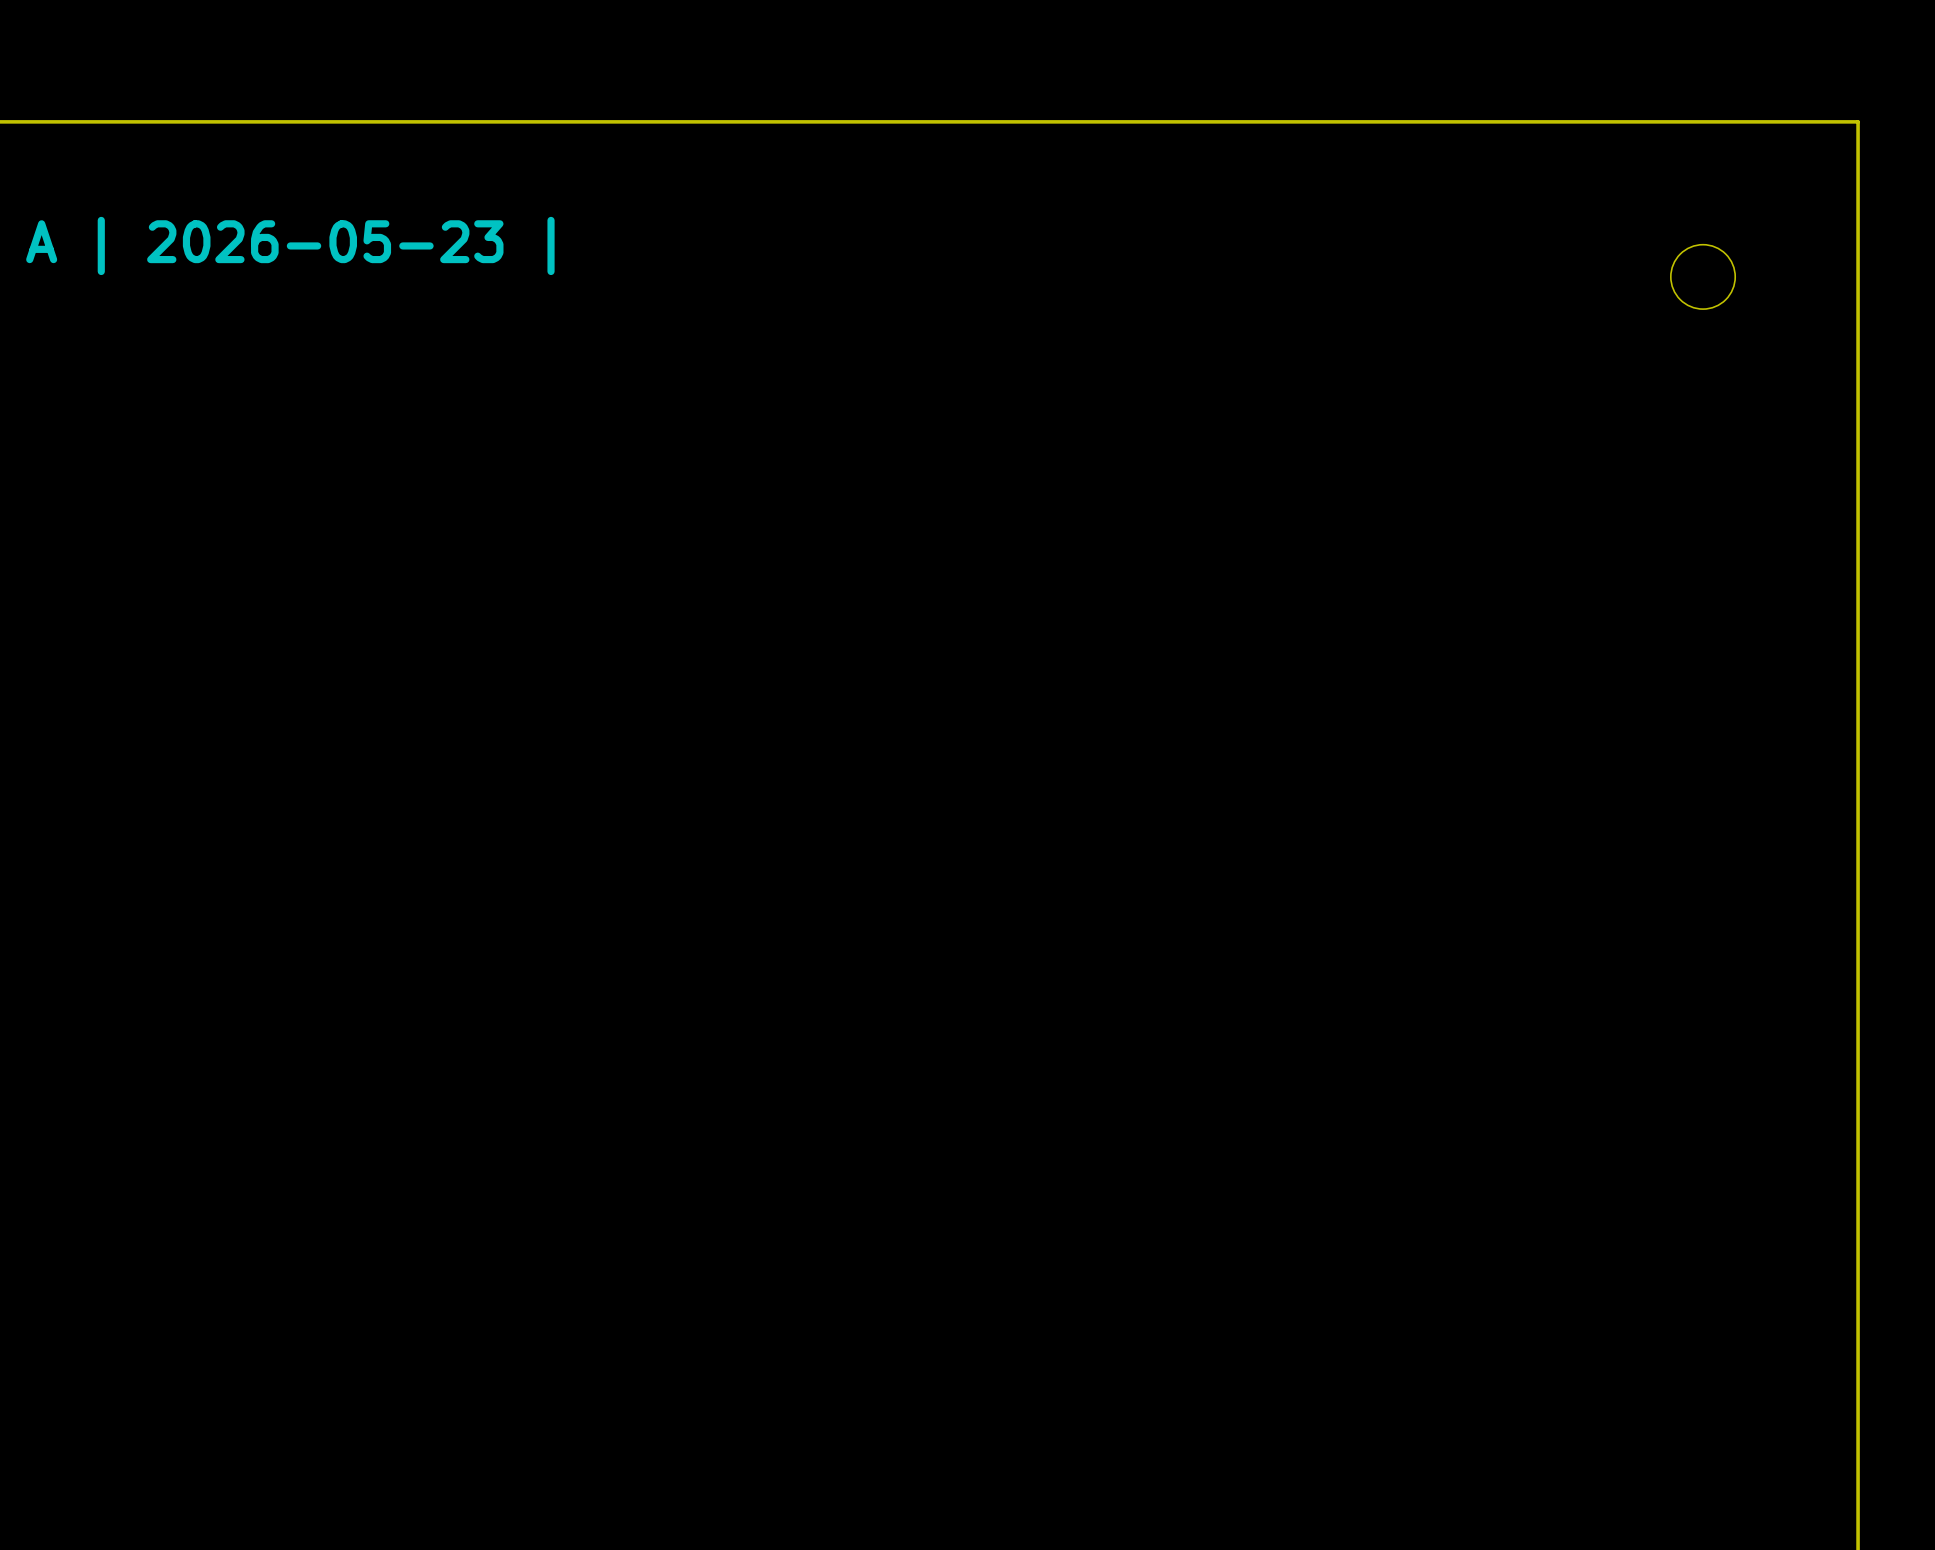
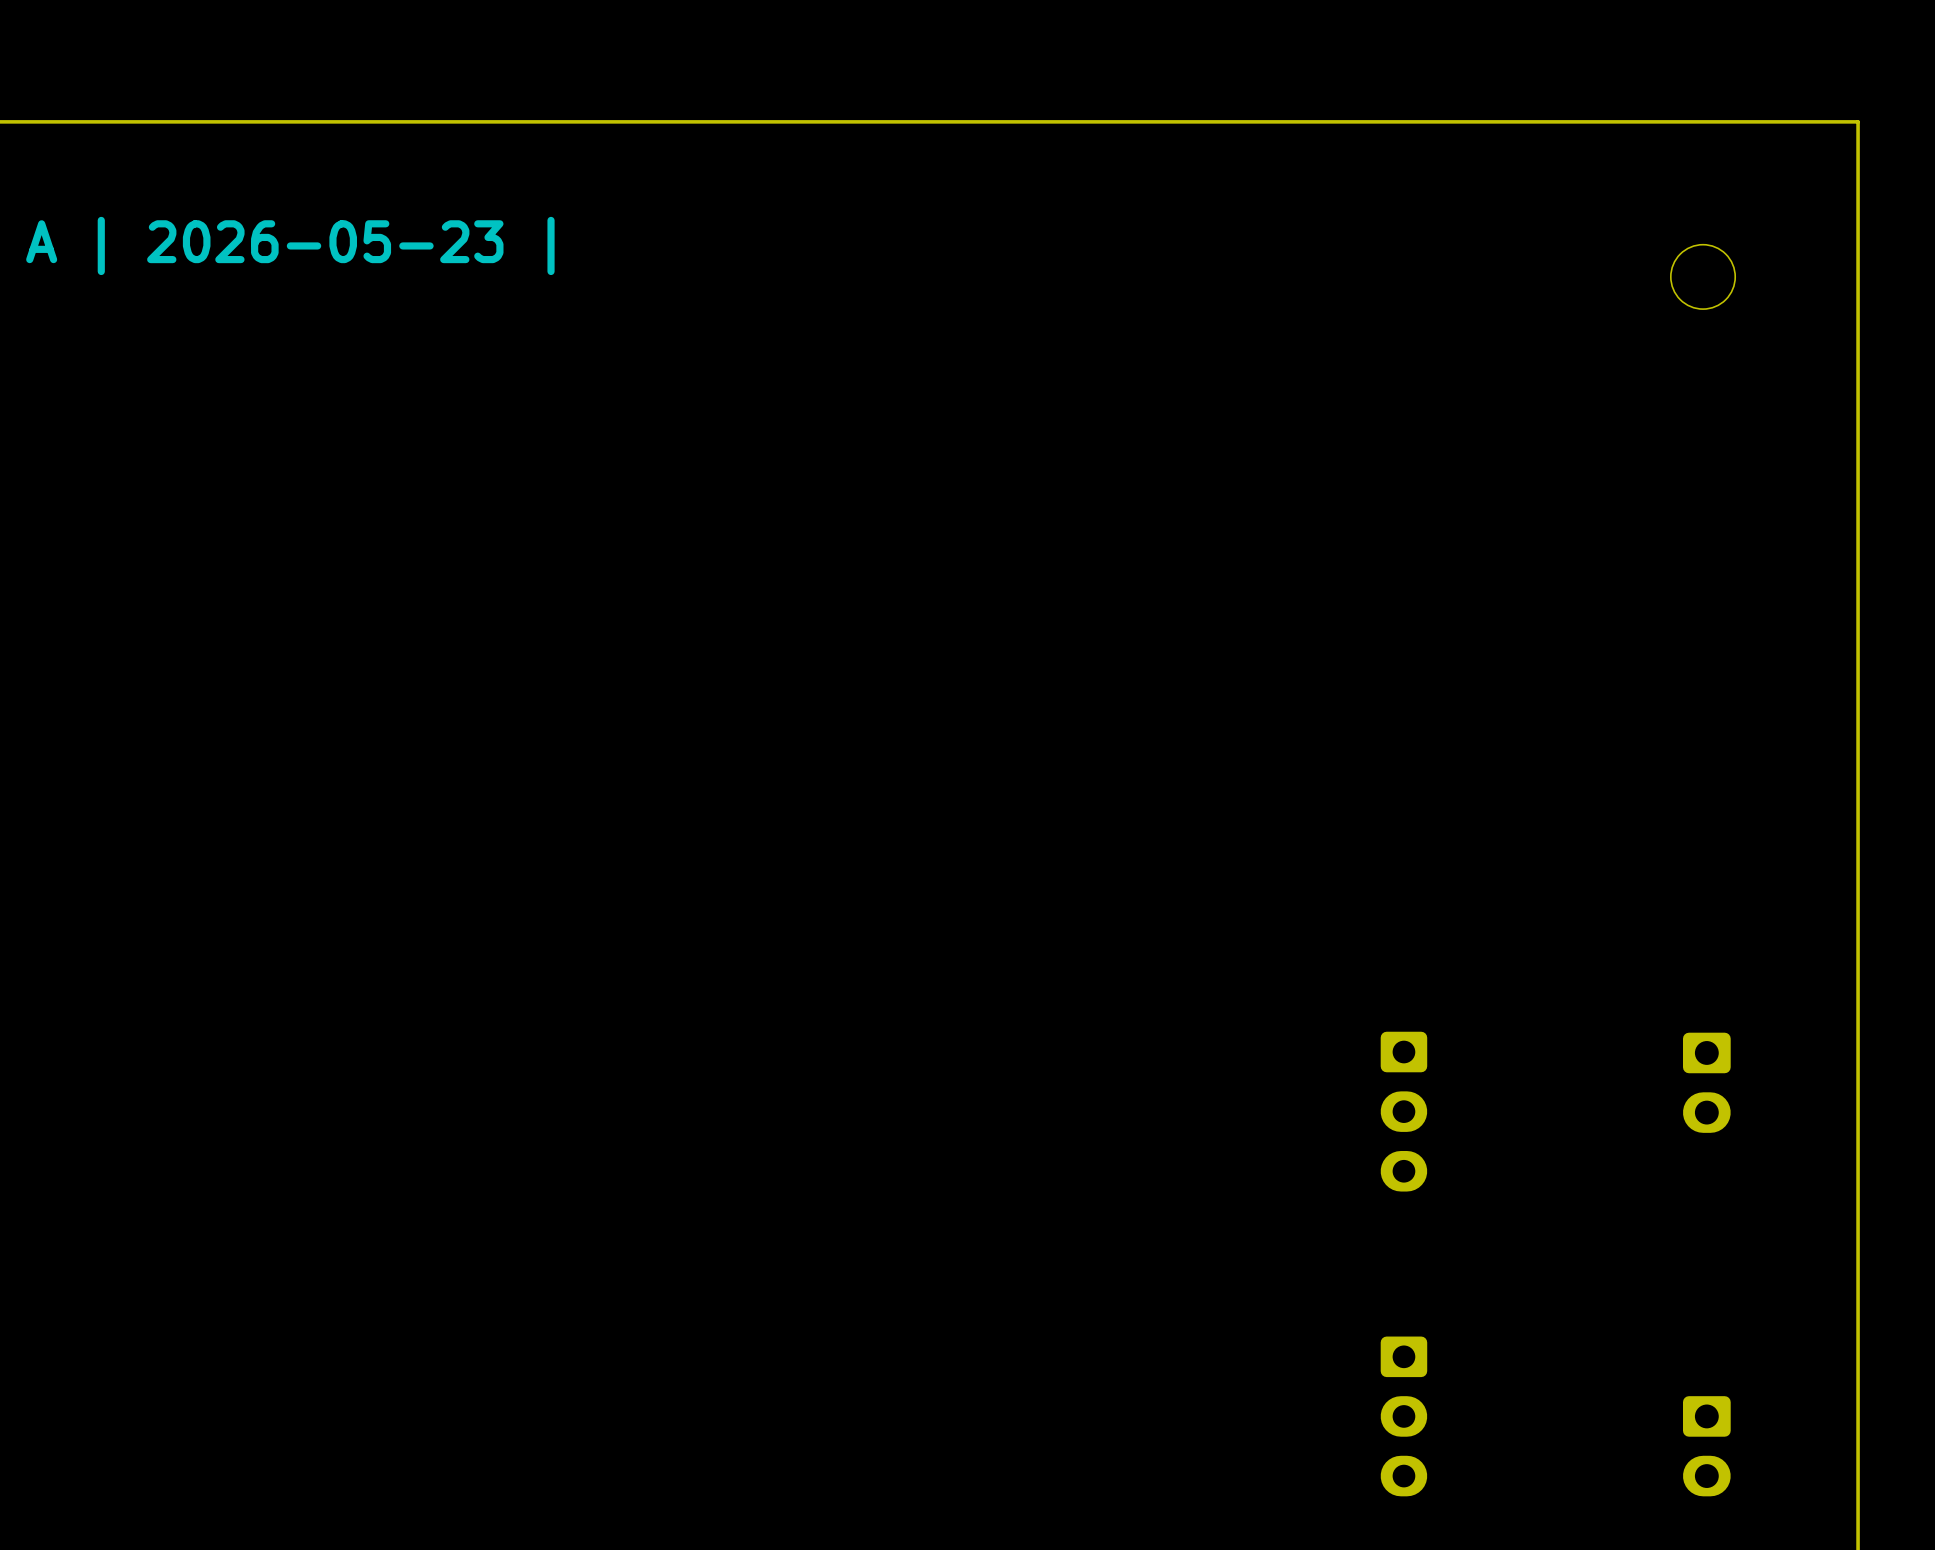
part: none -> (1706, 1082)
part: none -> (1403, 1111)
part: none -> (1403, 1416)
part: none -> (1706, 1446)

